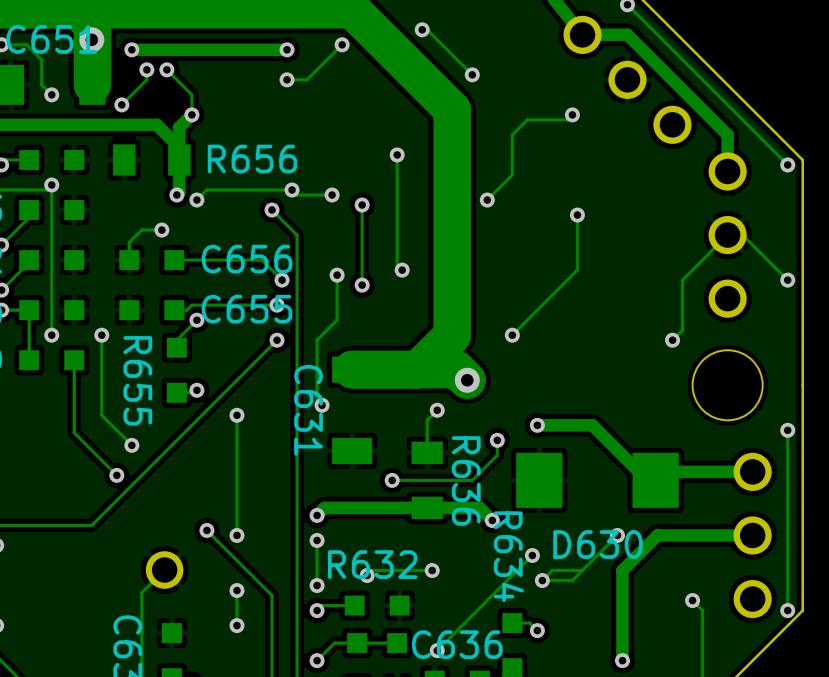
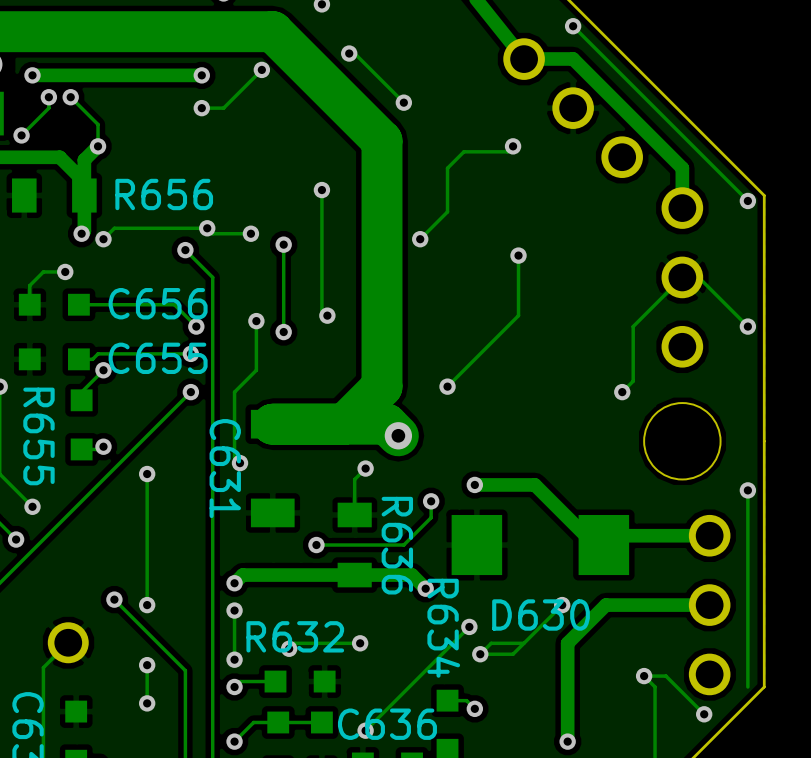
track: none -> (644, 676) (665, 676) (704, 714)
via position: (787, 610) -> (704, 714)

